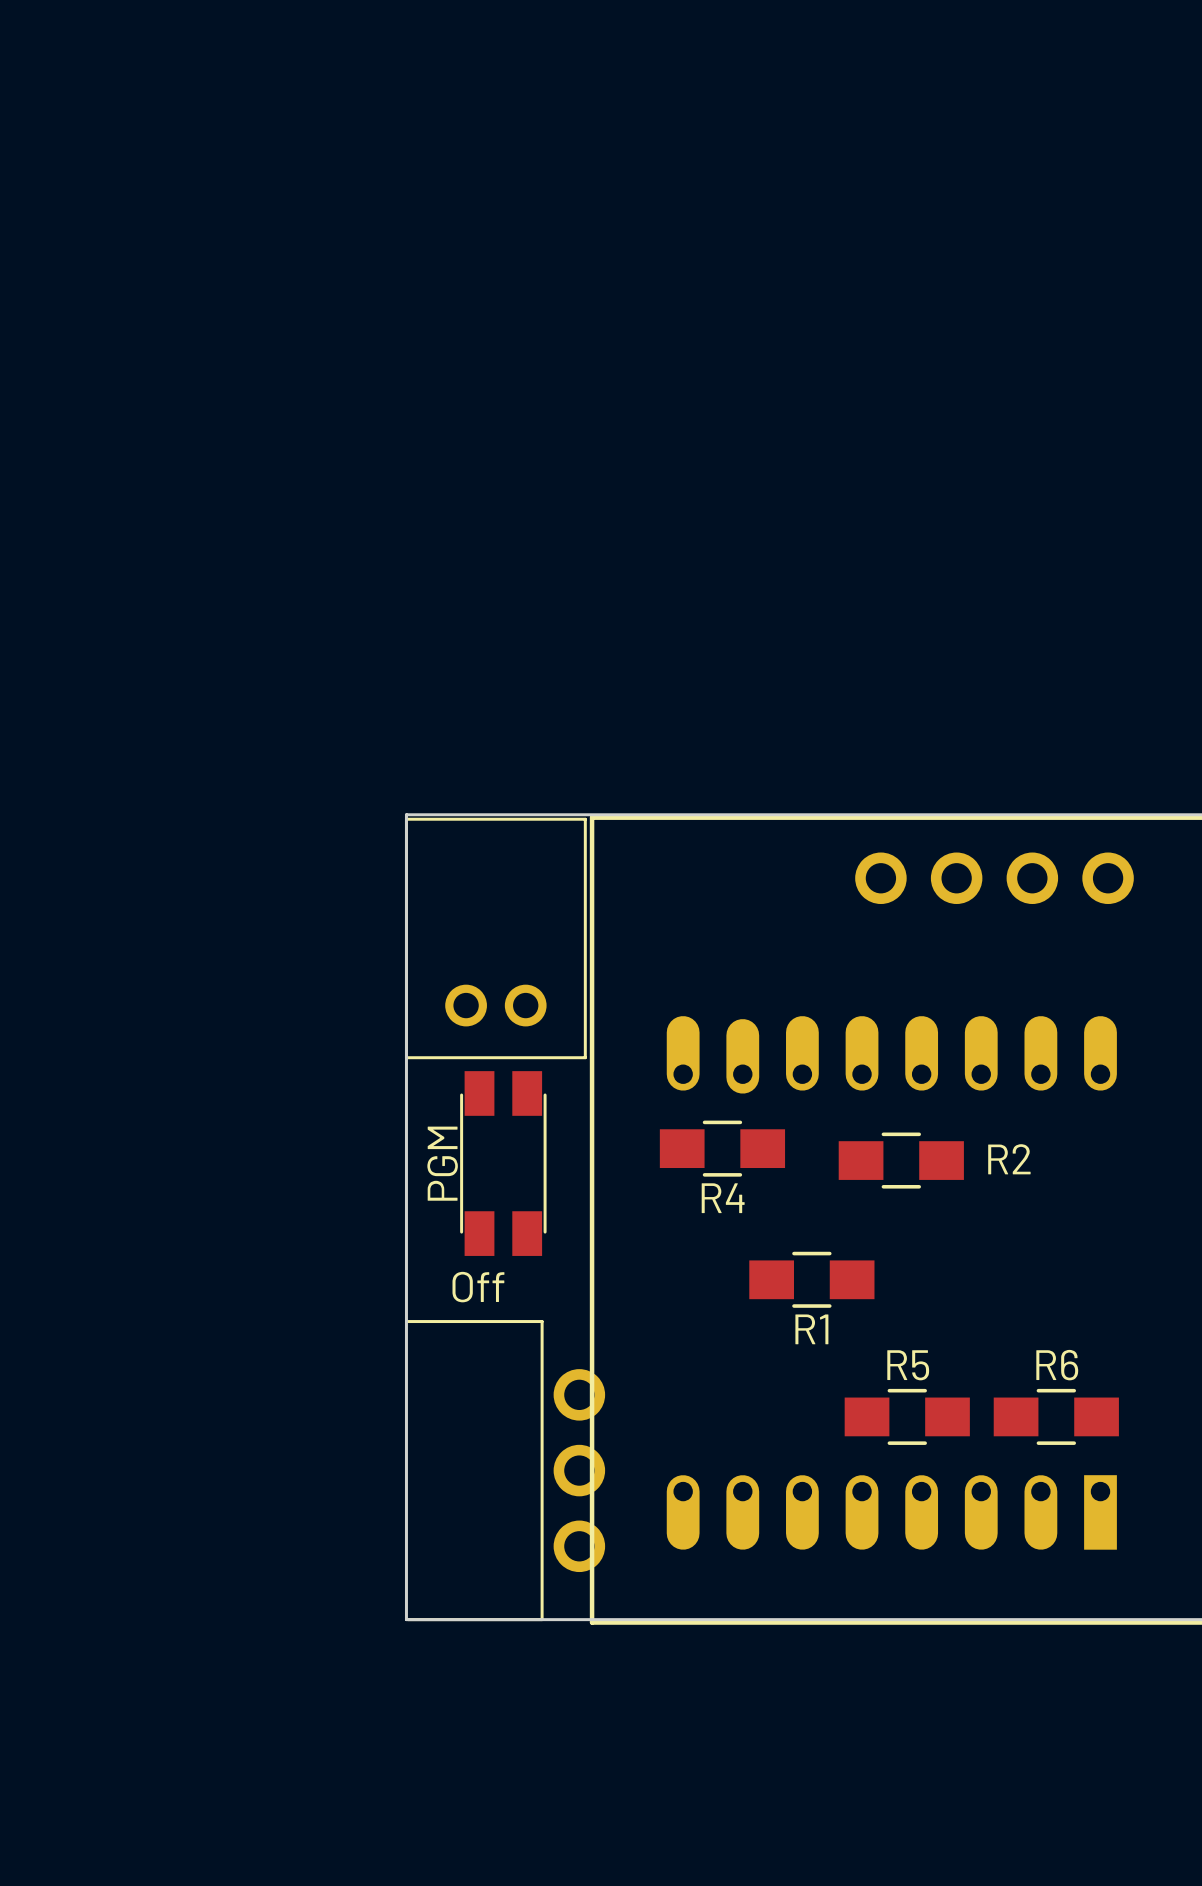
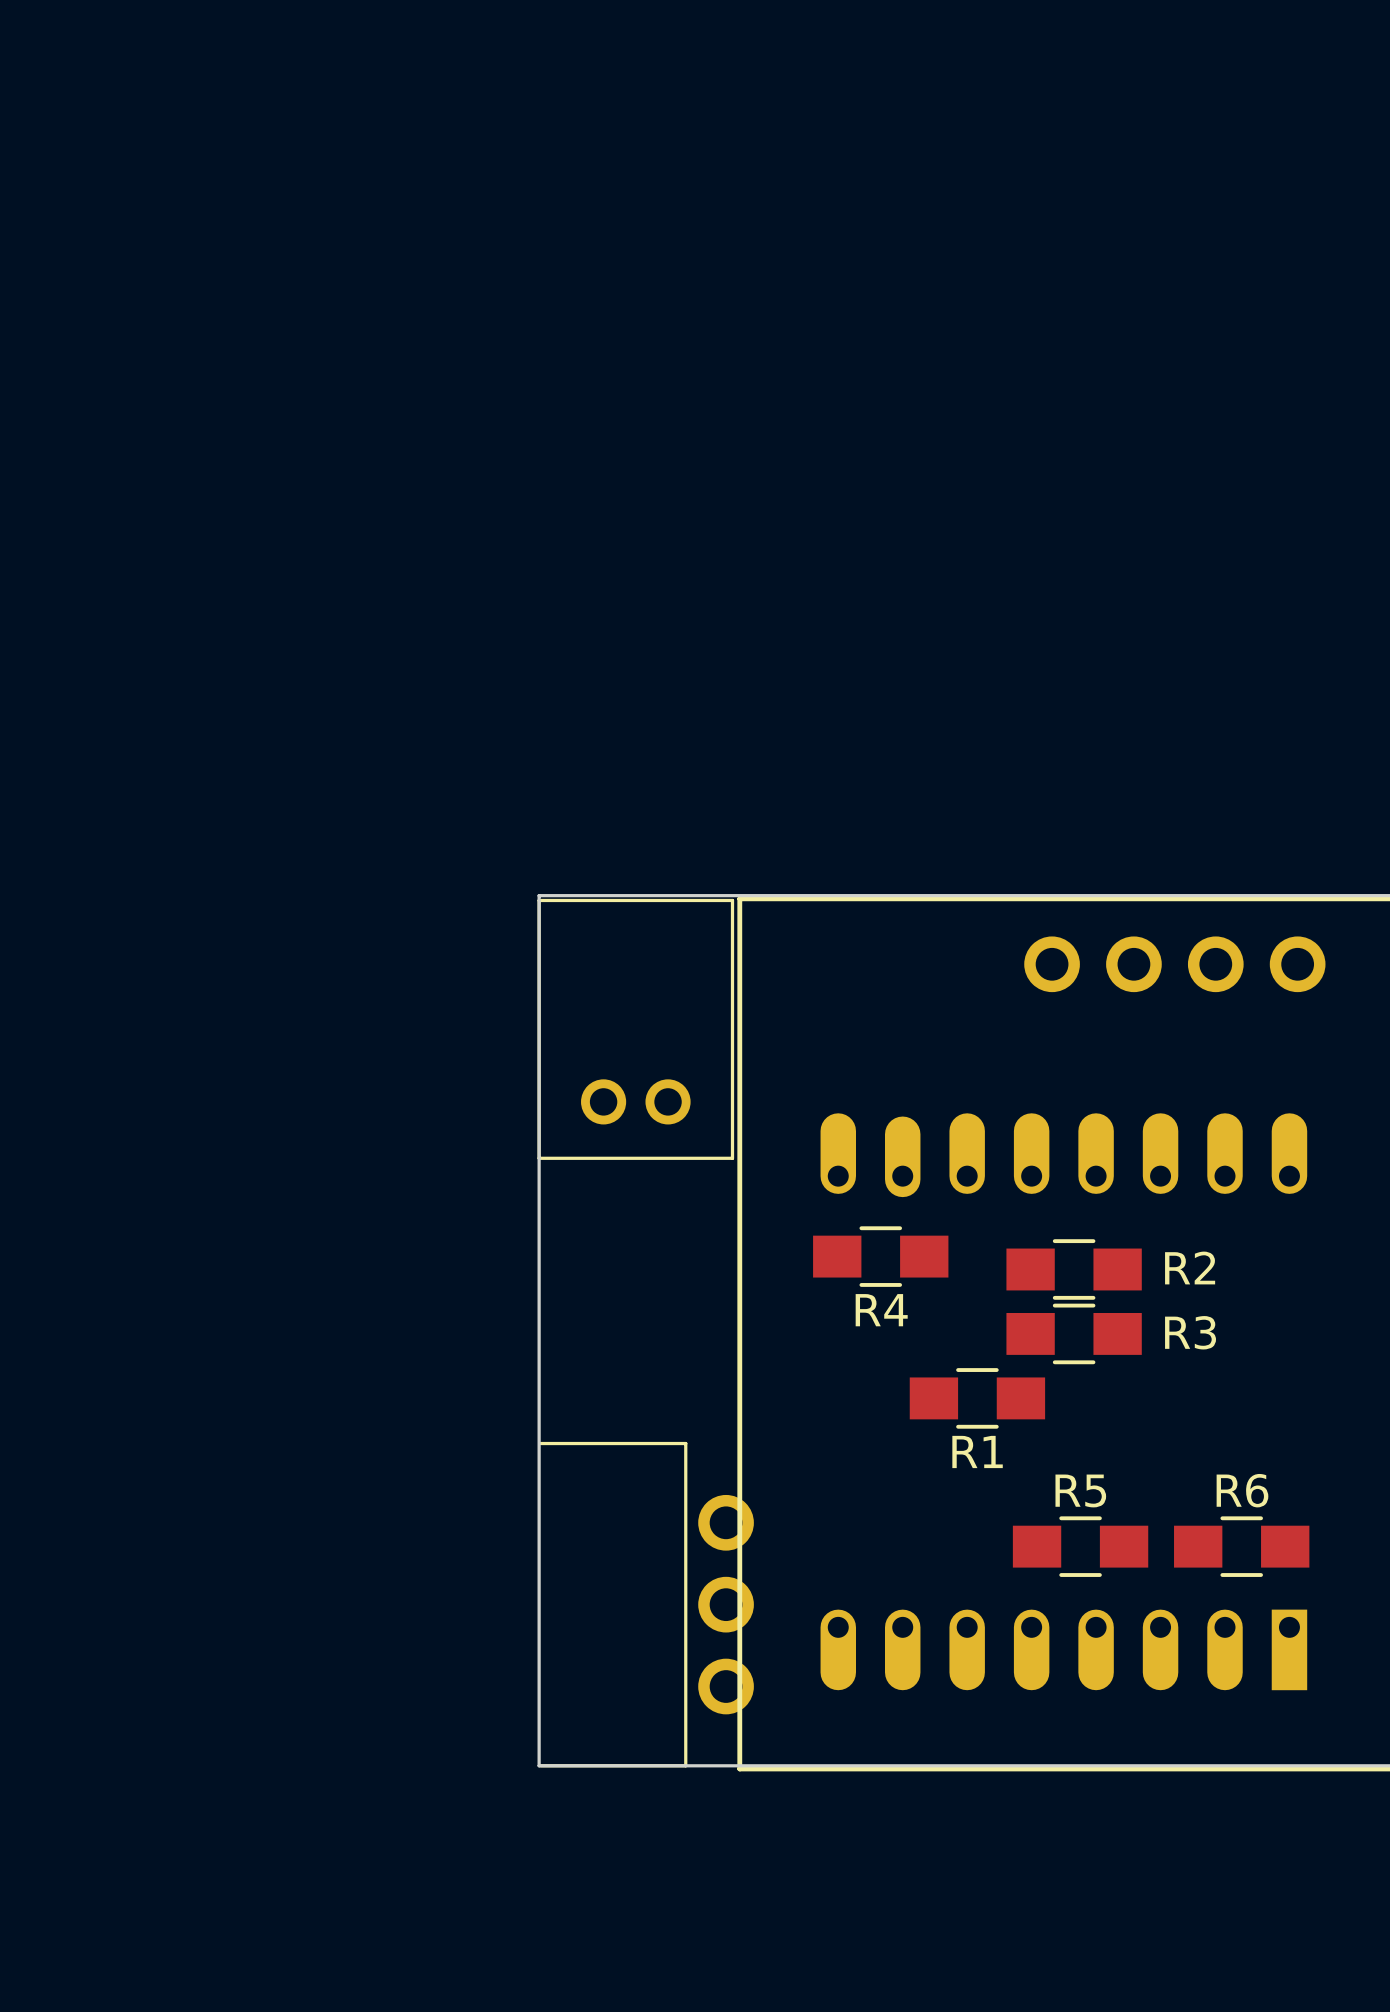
text: PGM (442, 1163) -> none
part: (503, 1163) -> none
R3: none -> (1074, 1333)
text: Off (478, 1287) -> none

